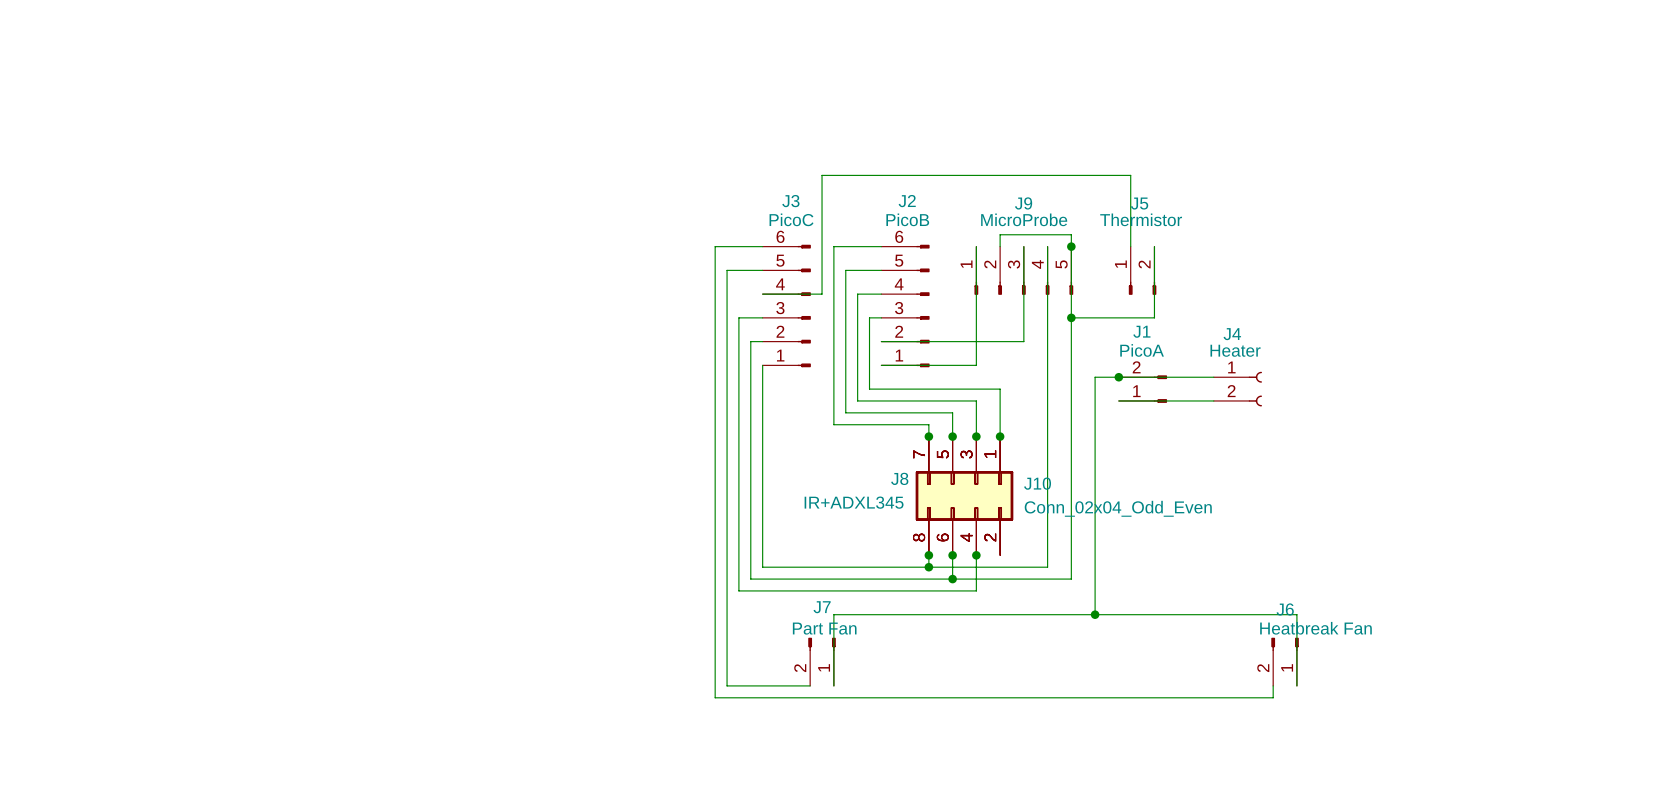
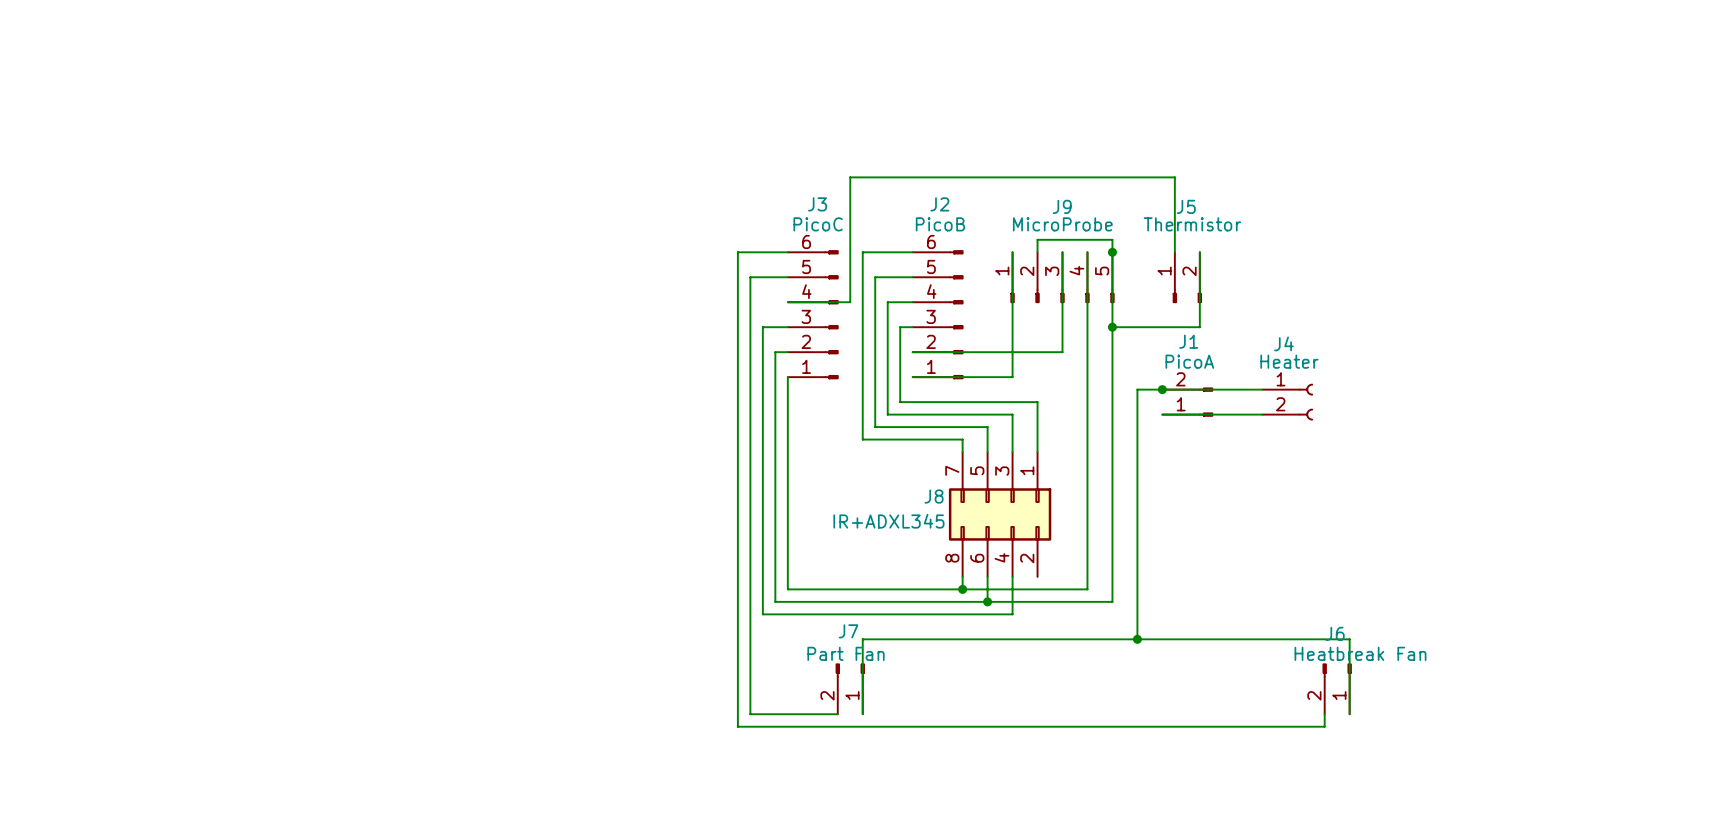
junction: (928, 436) -> none
junction: (952, 436) -> none
junction: (976, 436) -> none
junction: (1000, 436) -> none
J10: Conn_02x04_Odd_Even (964, 495) -> none
junction: (928, 555) -> none
junction: (952, 555) -> none
junction: (976, 555) -> none

